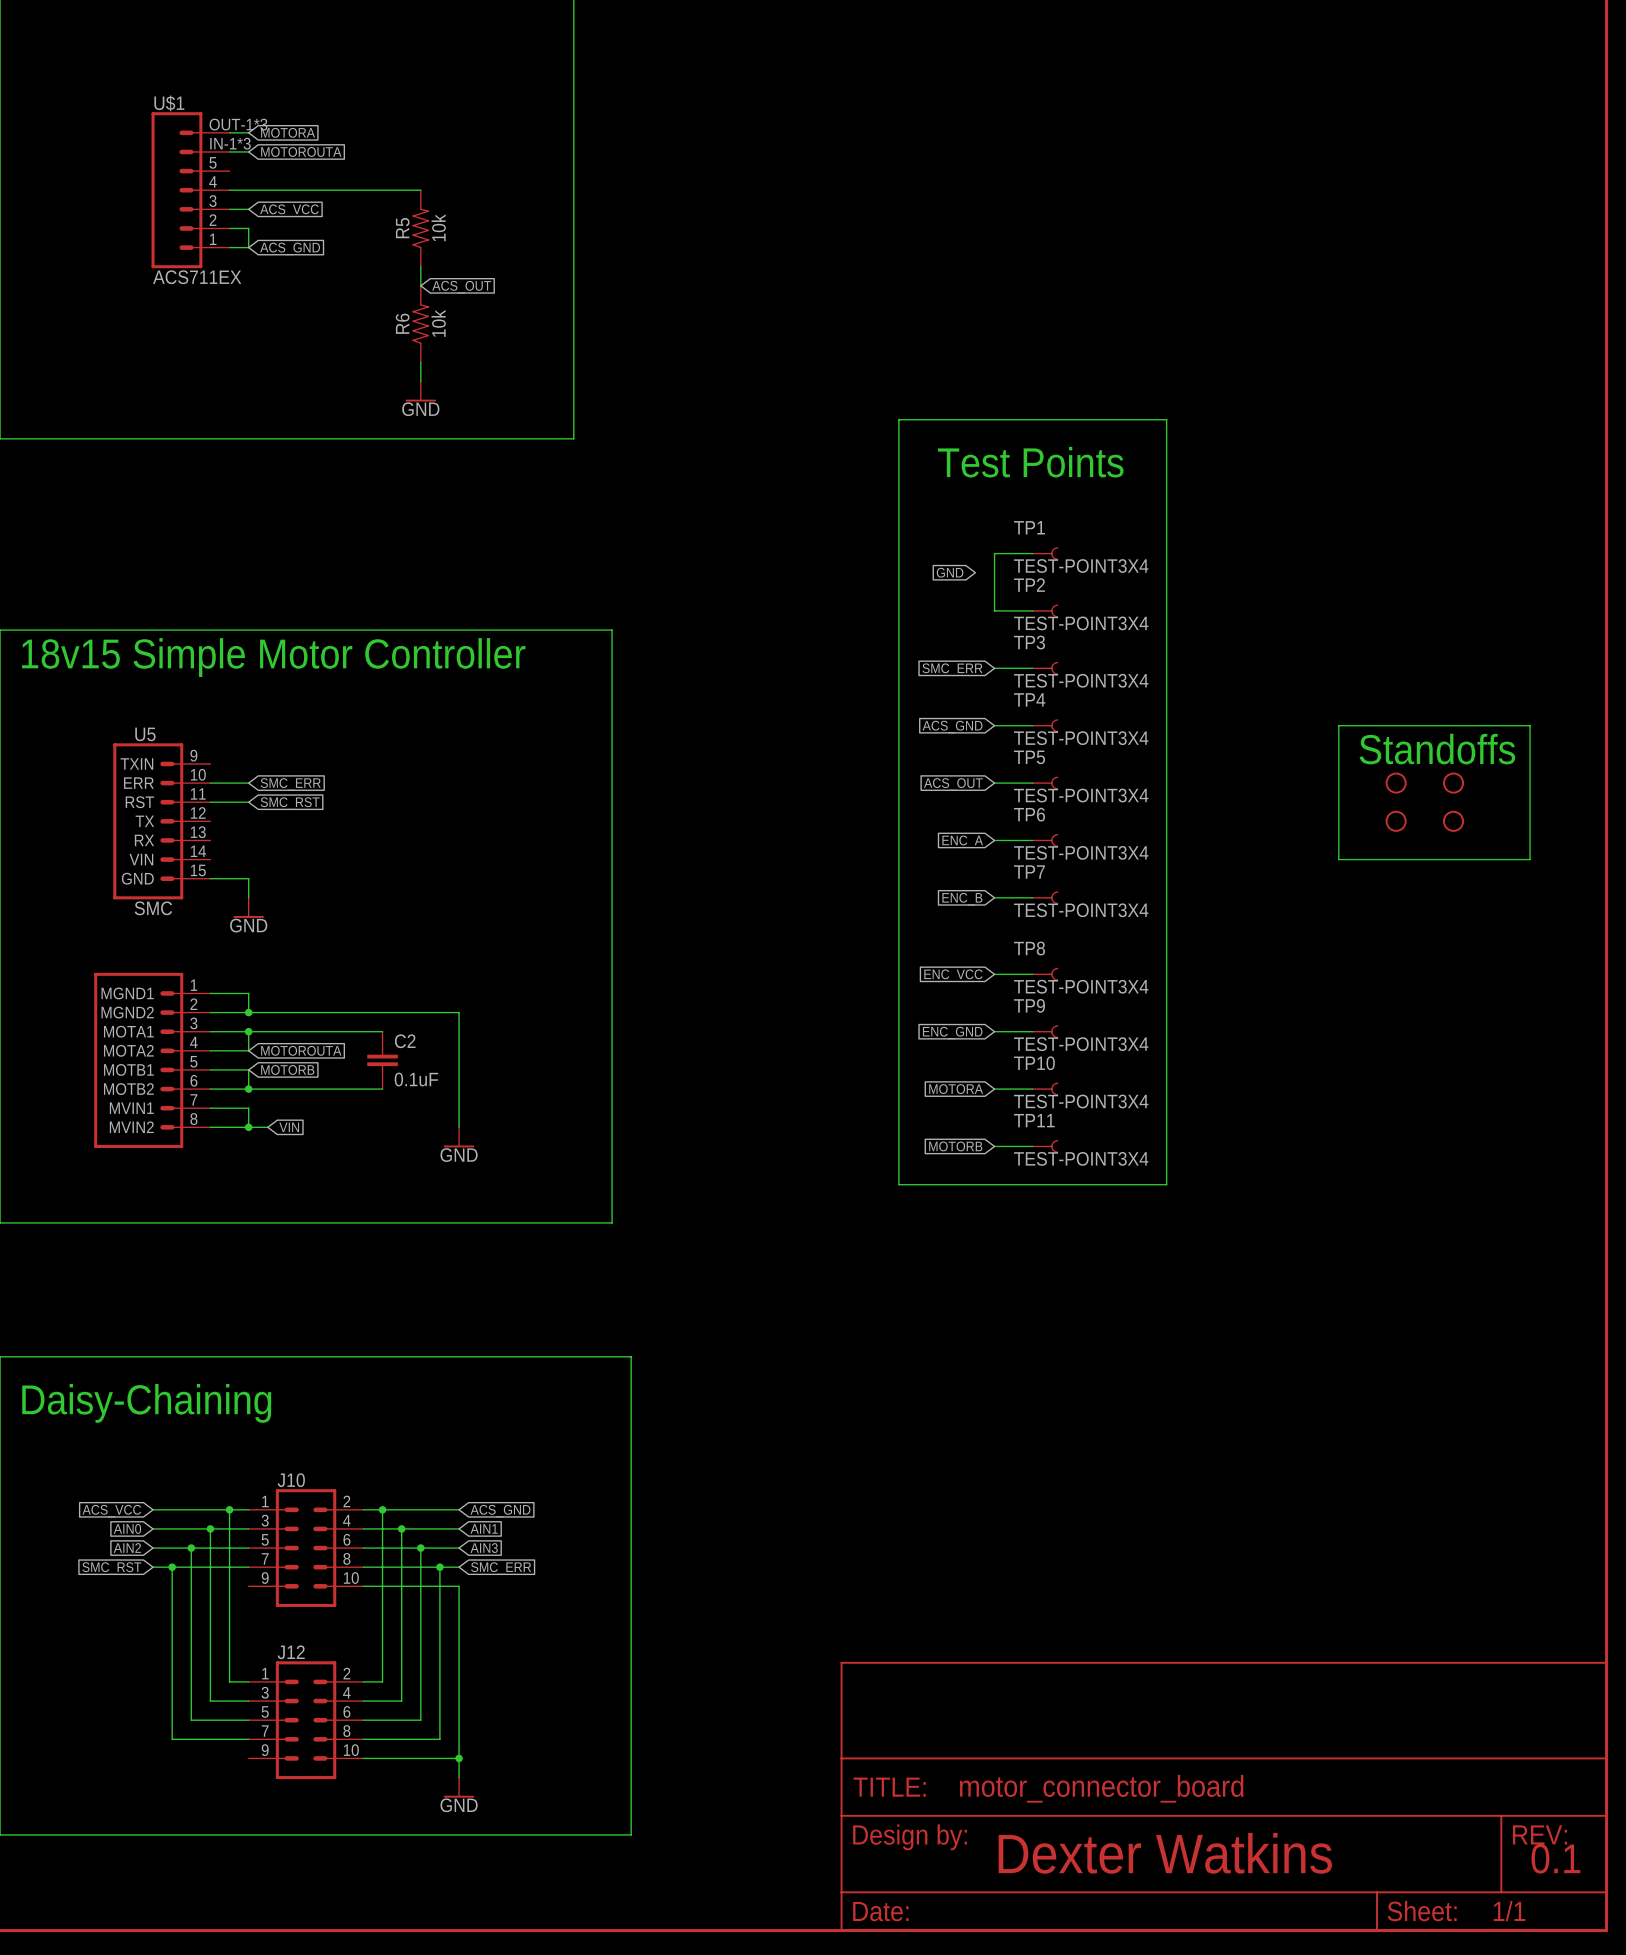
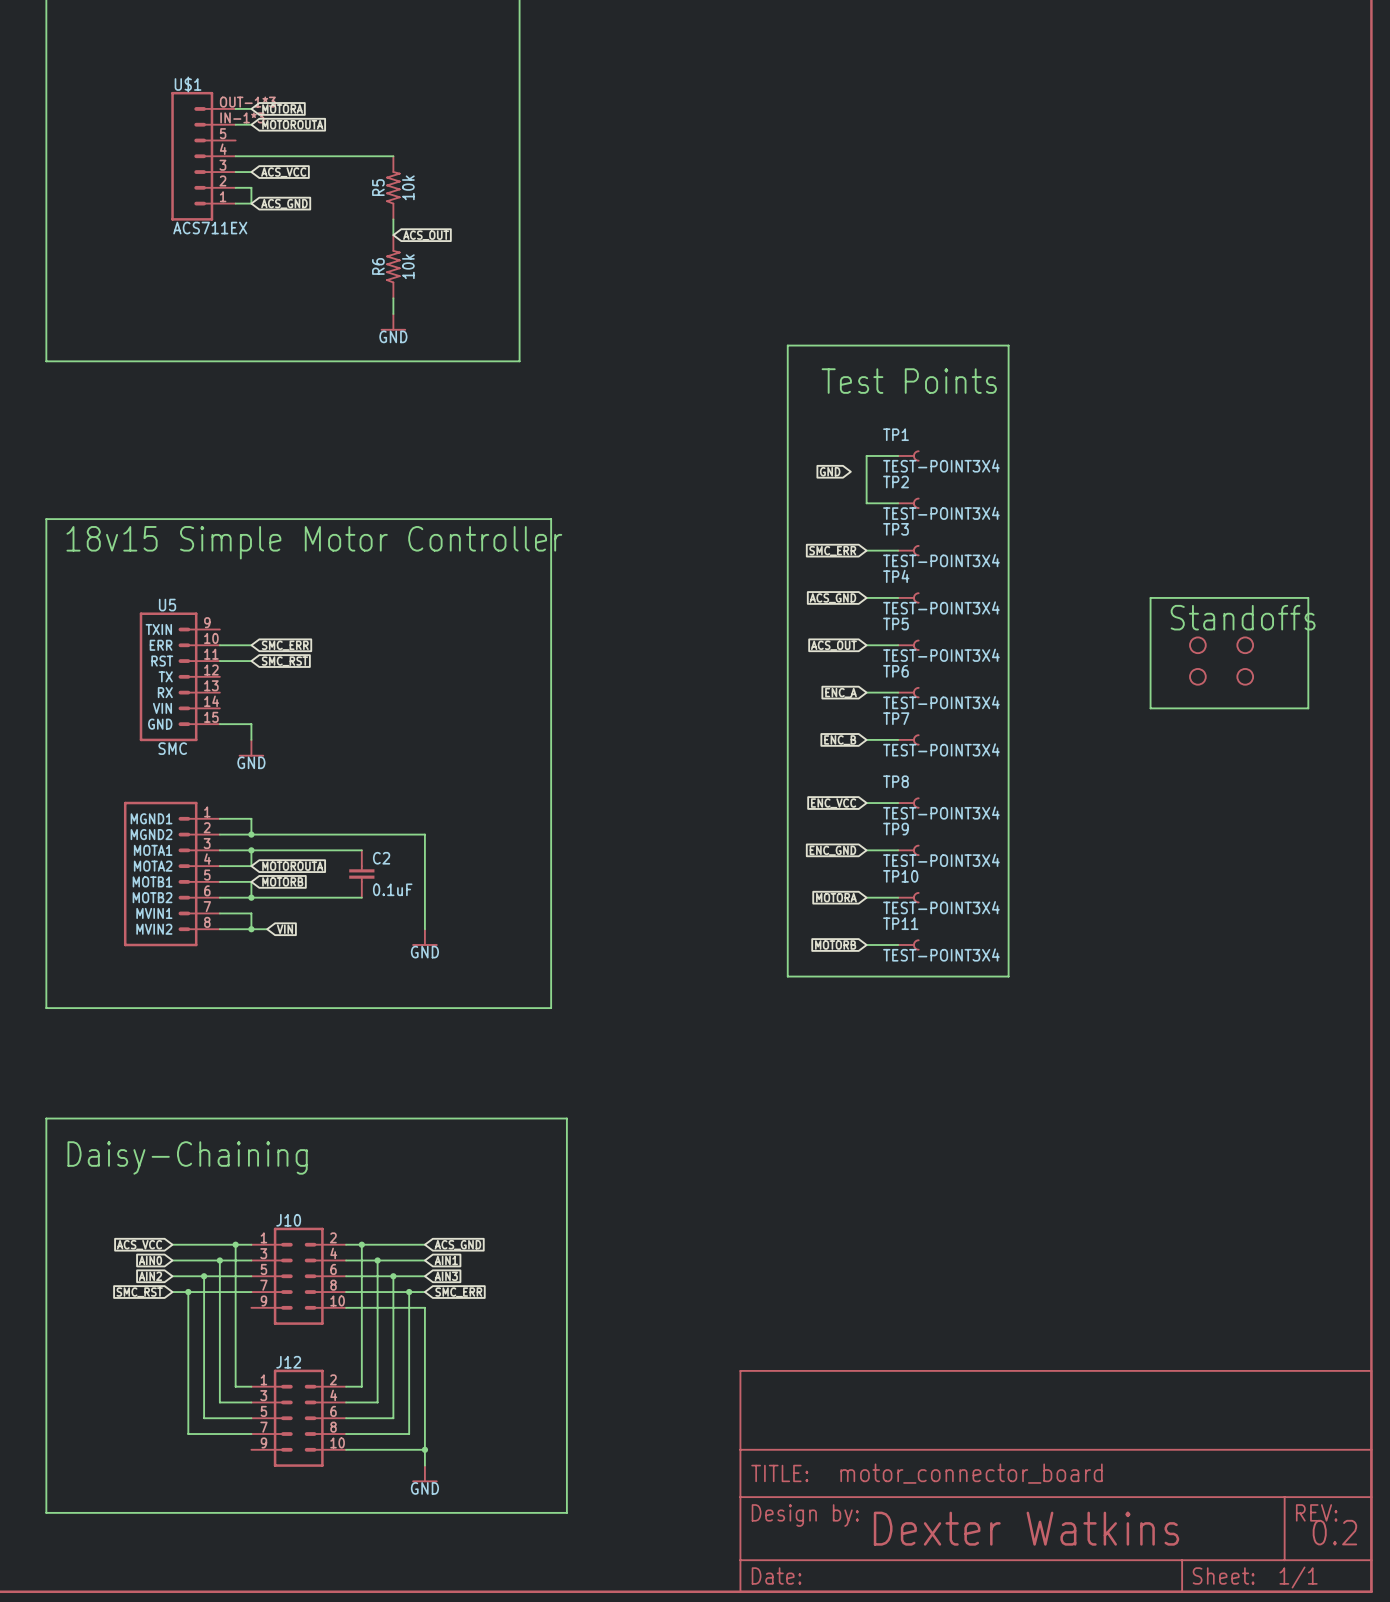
text: 0.1 (1555, 1858) -> 0.2 (1334, 1532)

